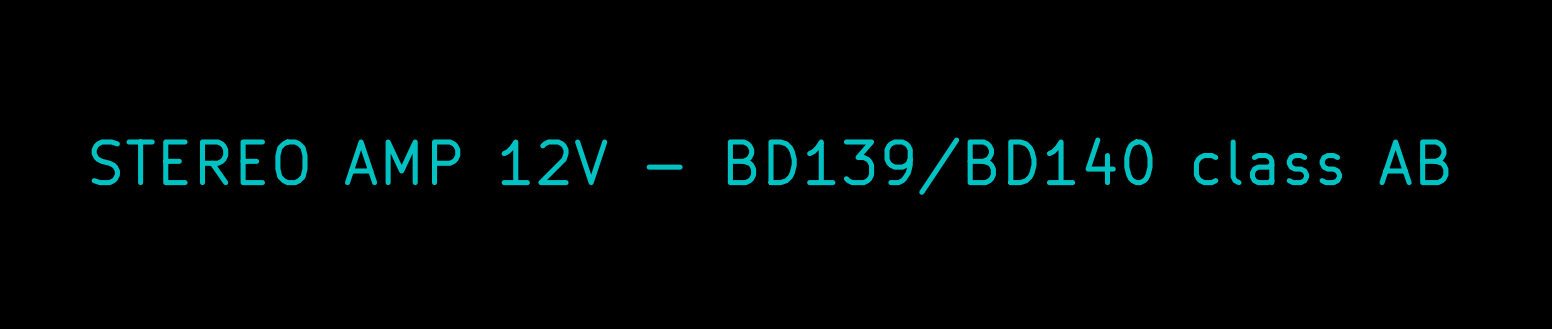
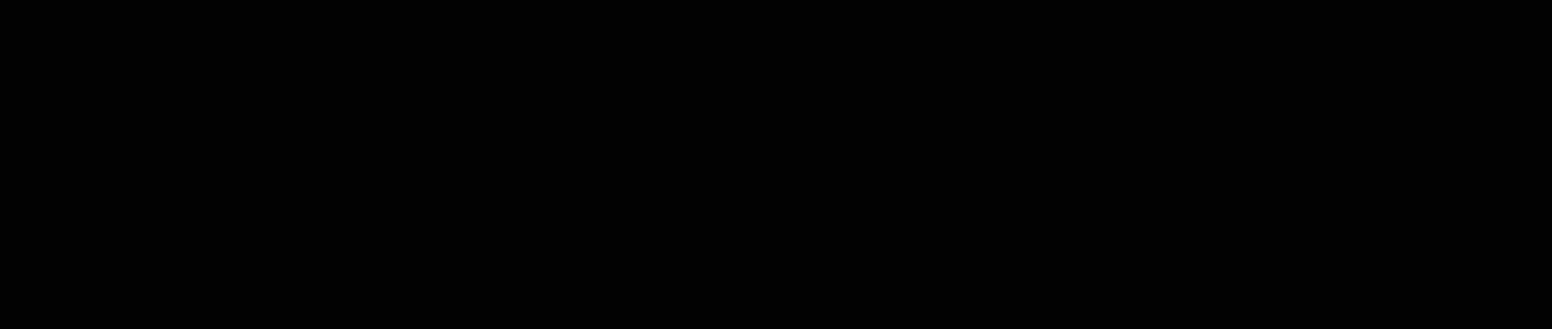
text: STEREO AMP 12V - BD139/BD140 class AB (770, 166) -> none

